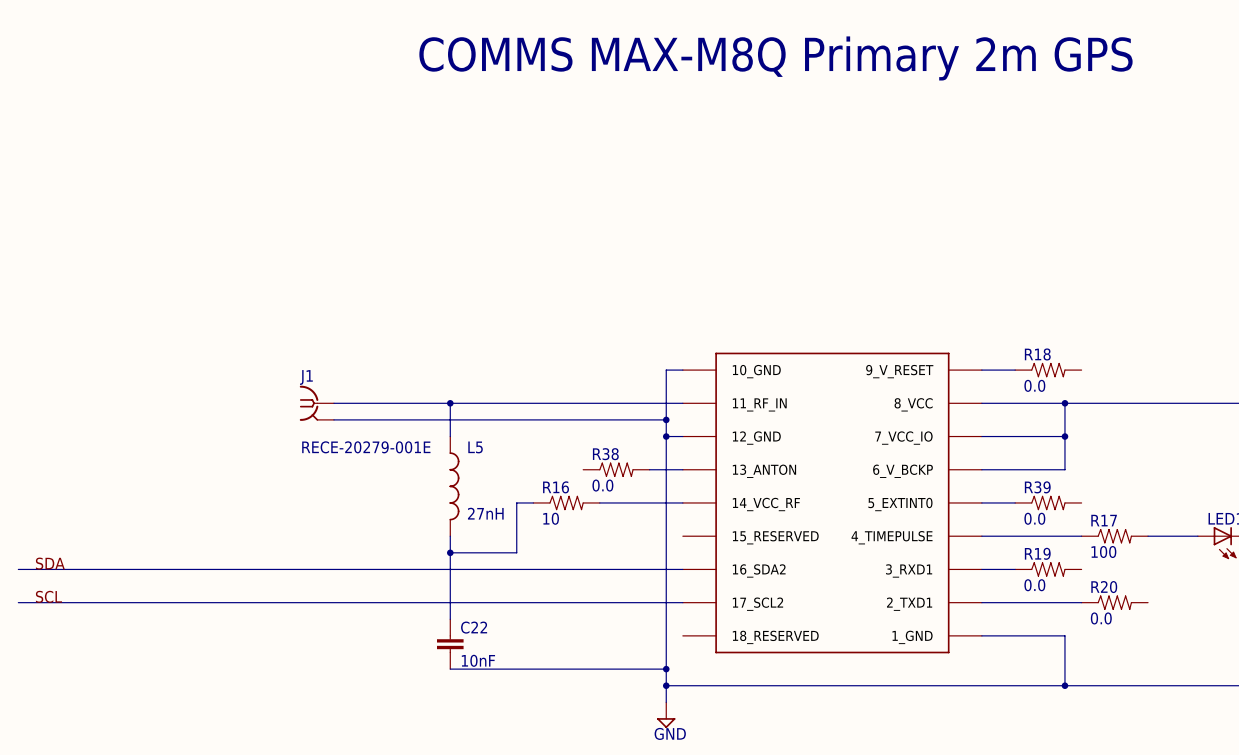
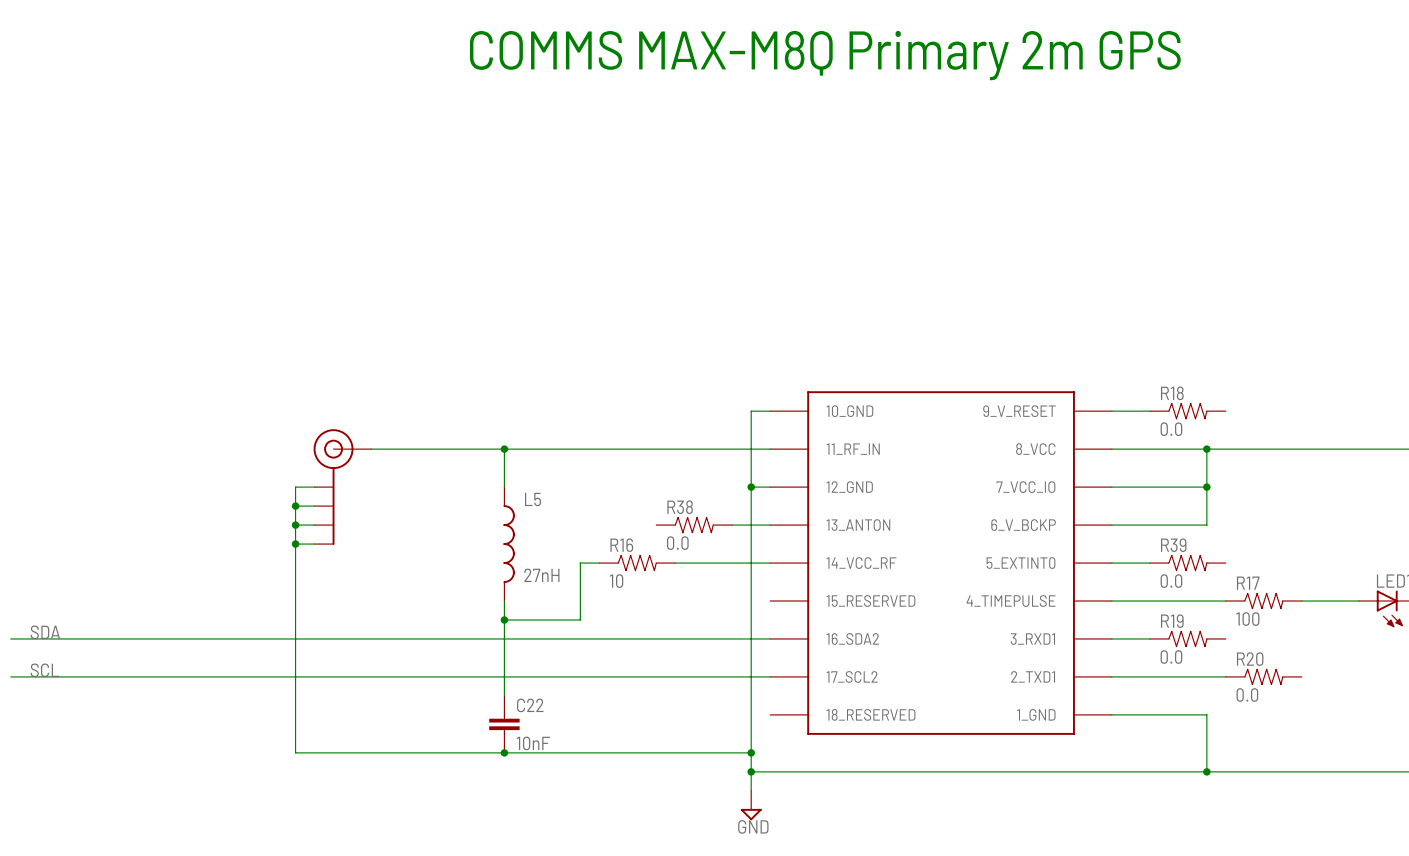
J1: RECE-20279-001E (316, 403) -> none
wire: (333, 419) (666, 419) -> none
junction: (666, 419) -> none
wire: none -> (314, 487) (295, 487) (295, 752) (504, 752)
part: none -> (342, 487)
wire: none -> (295, 506) (314, 506)
junction: none -> (295, 506)
wire: none -> (295, 525) (314, 525)
junction: none -> (295, 525)
wire: none -> (295, 544) (314, 544)
junction: none -> (295, 544)
junction: none -> (504, 752)

